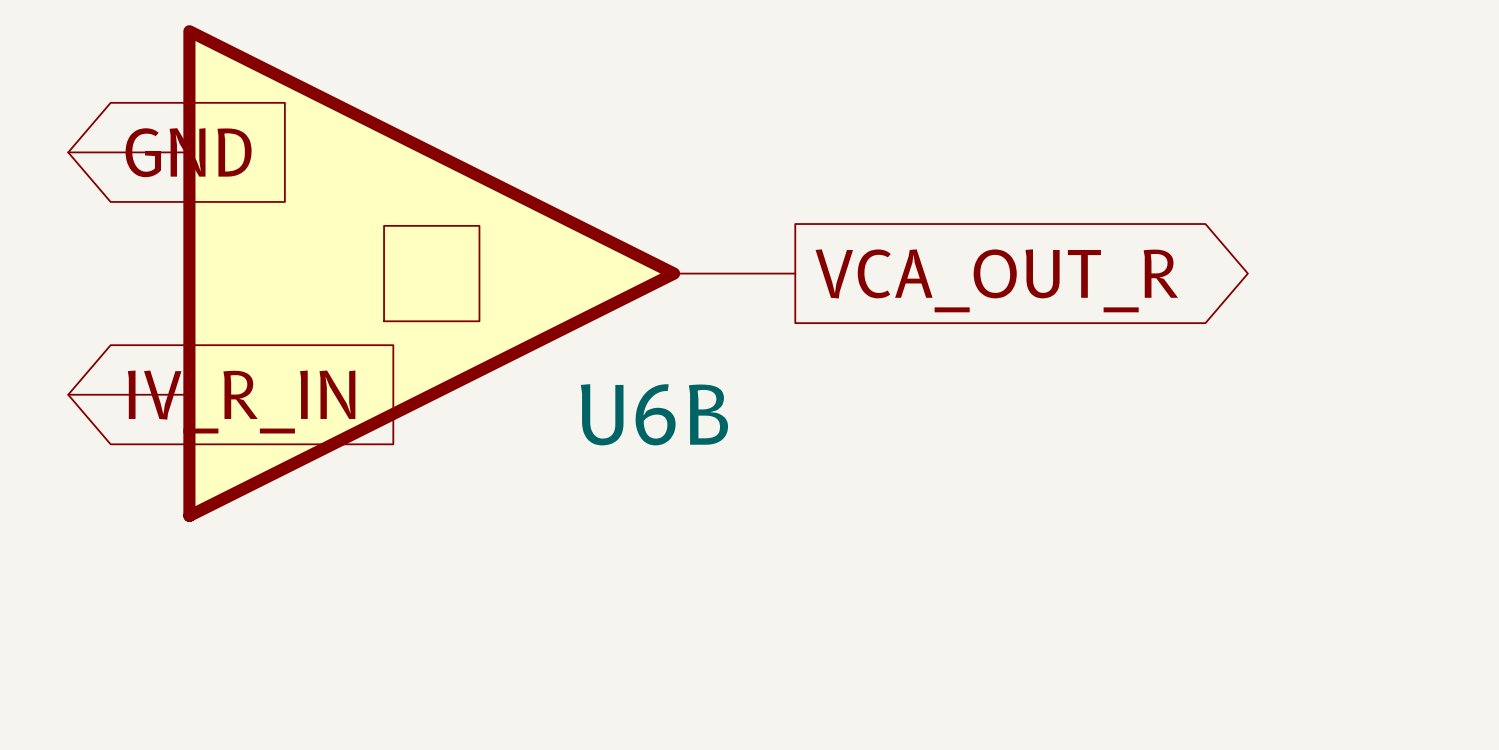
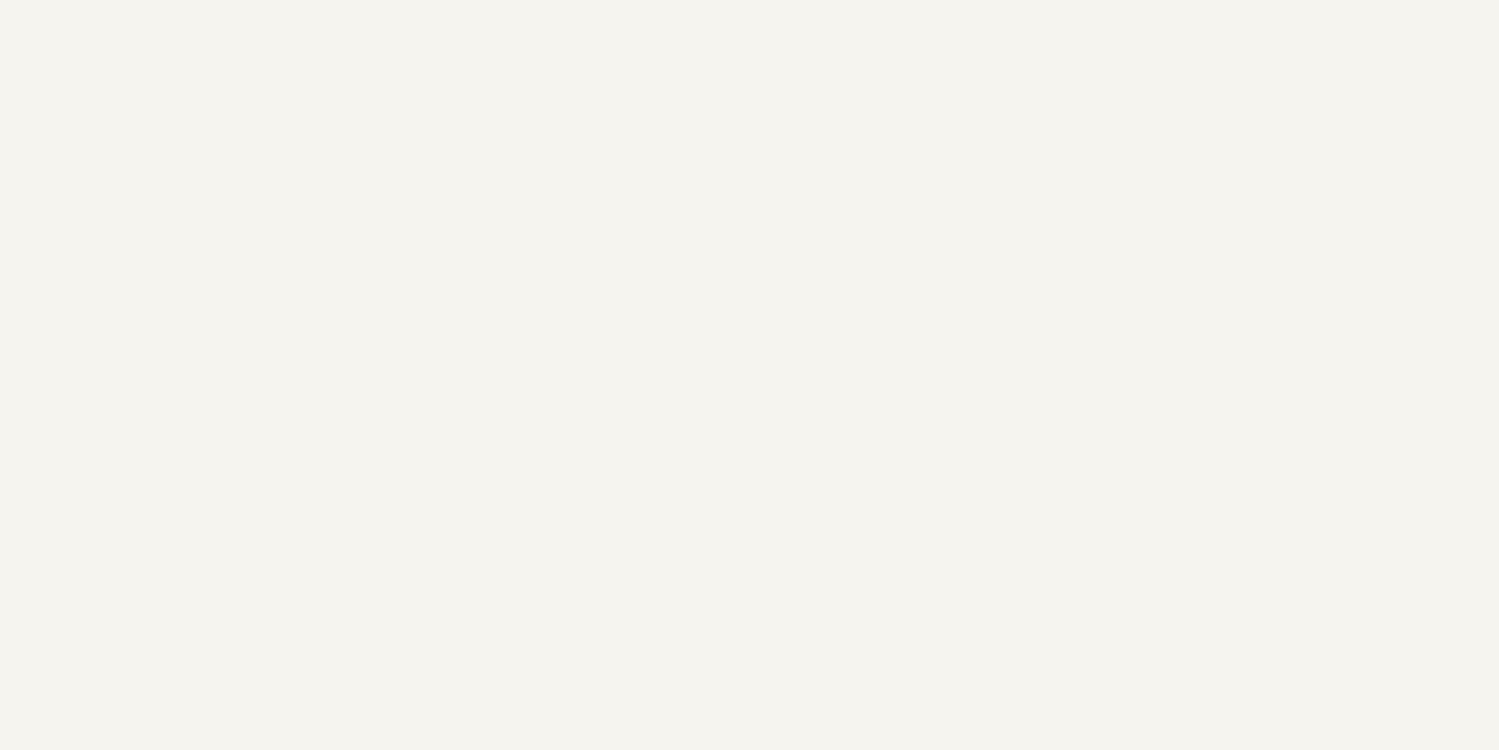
global label: GND (188, 152) -> none
U6B: (431, 273) -> none
global label: VCA_OUT_R (996, 280) -> none
global label: IV_R_IN (241, 402) -> none

